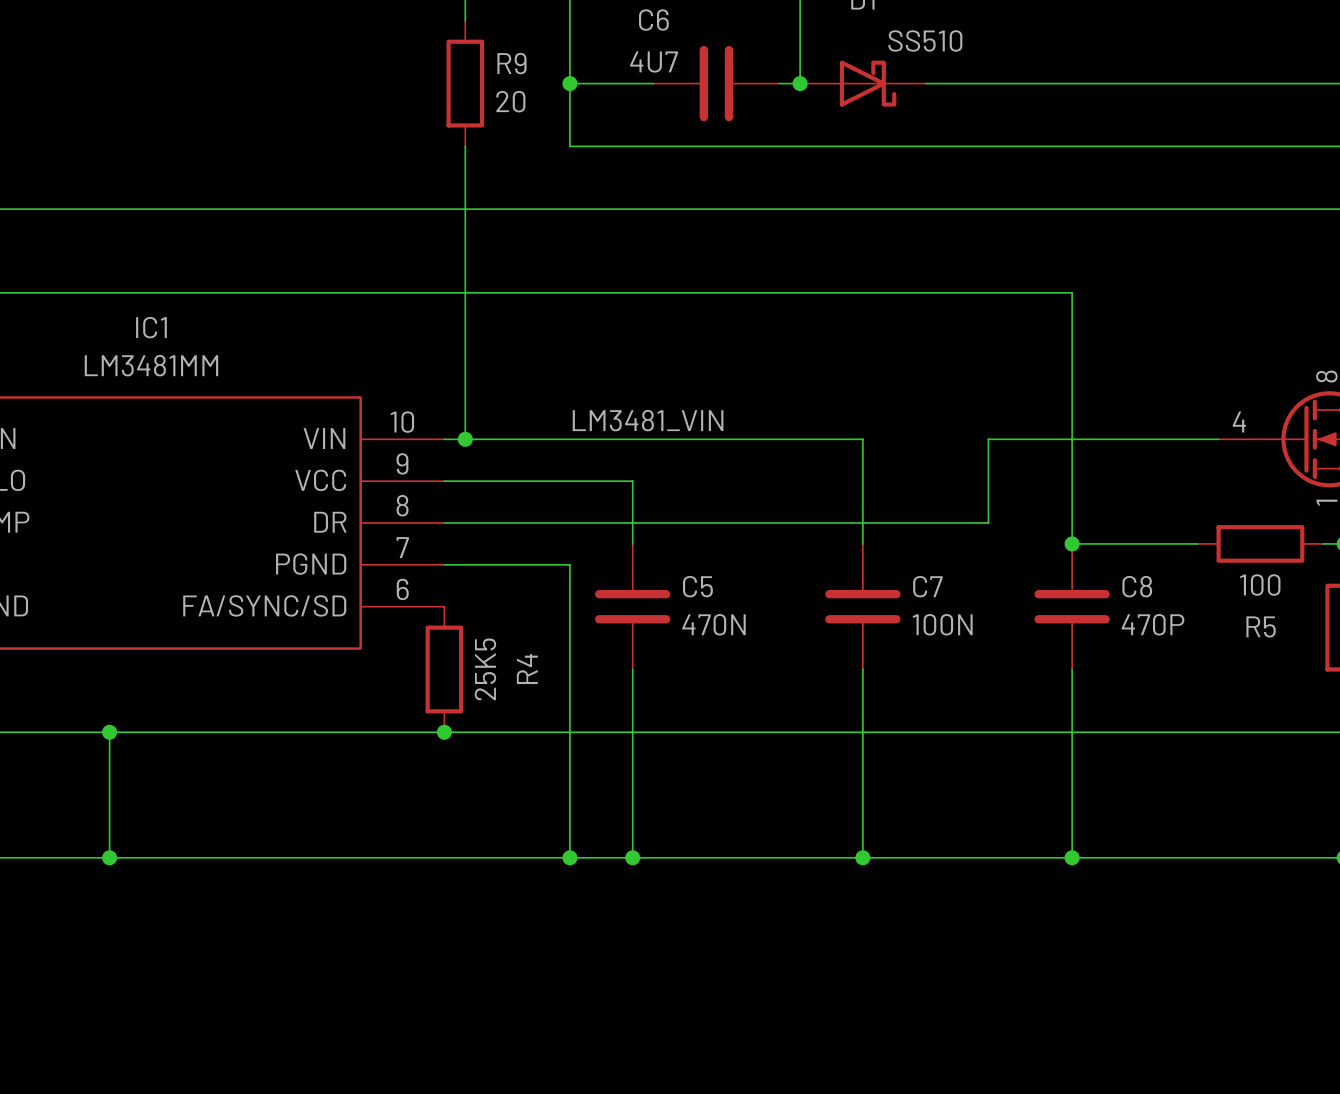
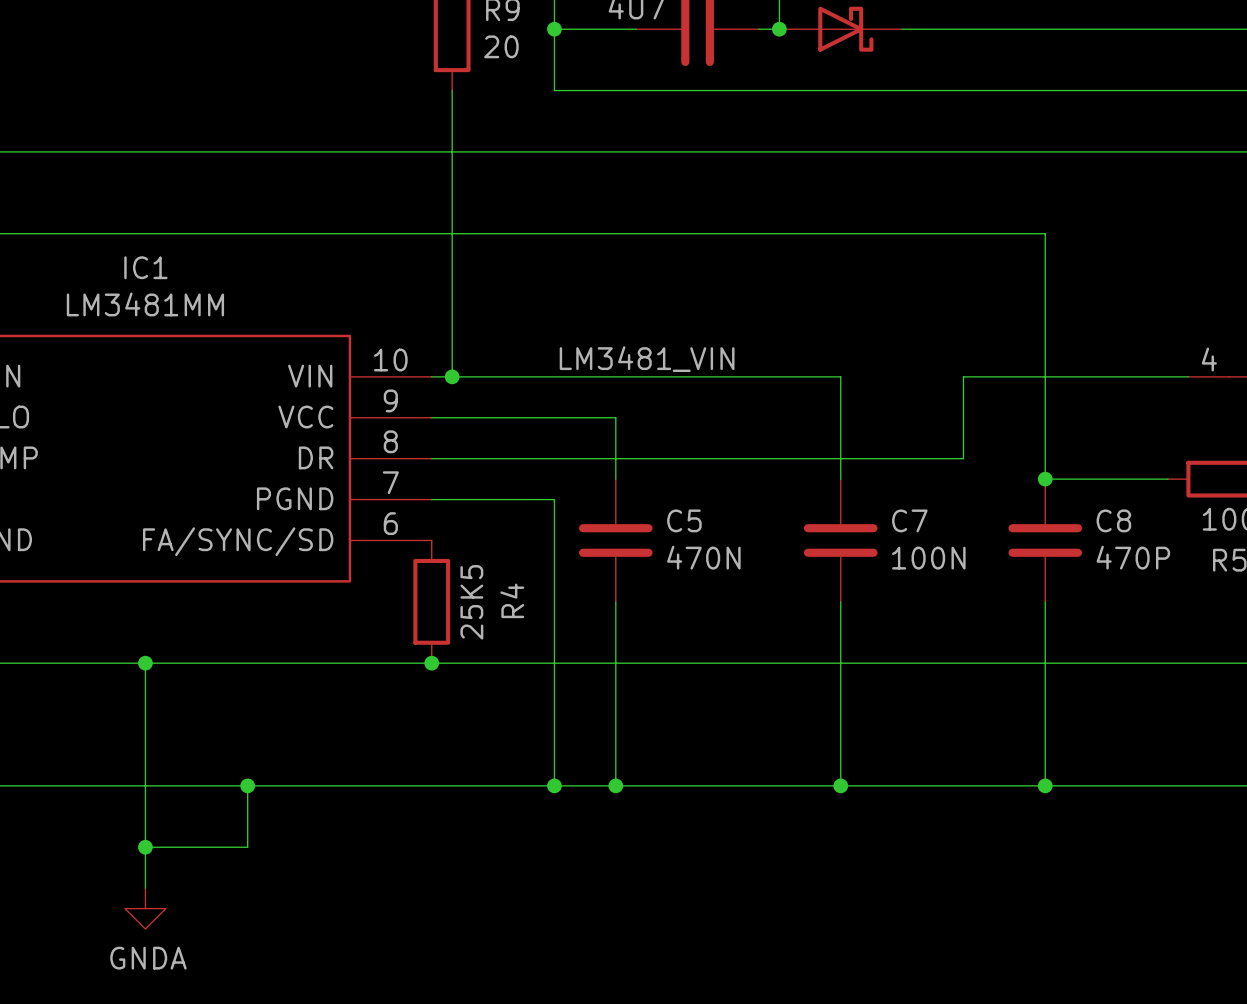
wire: (109, 732) (109, 857) -> none
junction position: (109, 732) -> (145, 663)
wire: none -> (145, 663) (145, 888)
junction: (109, 857) -> none
wire: none -> (247, 785) (247, 847) (145, 847)
junction: none -> (247, 785)
junction: none -> (145, 847)
power symbol: none -> GNDA (145, 908)

